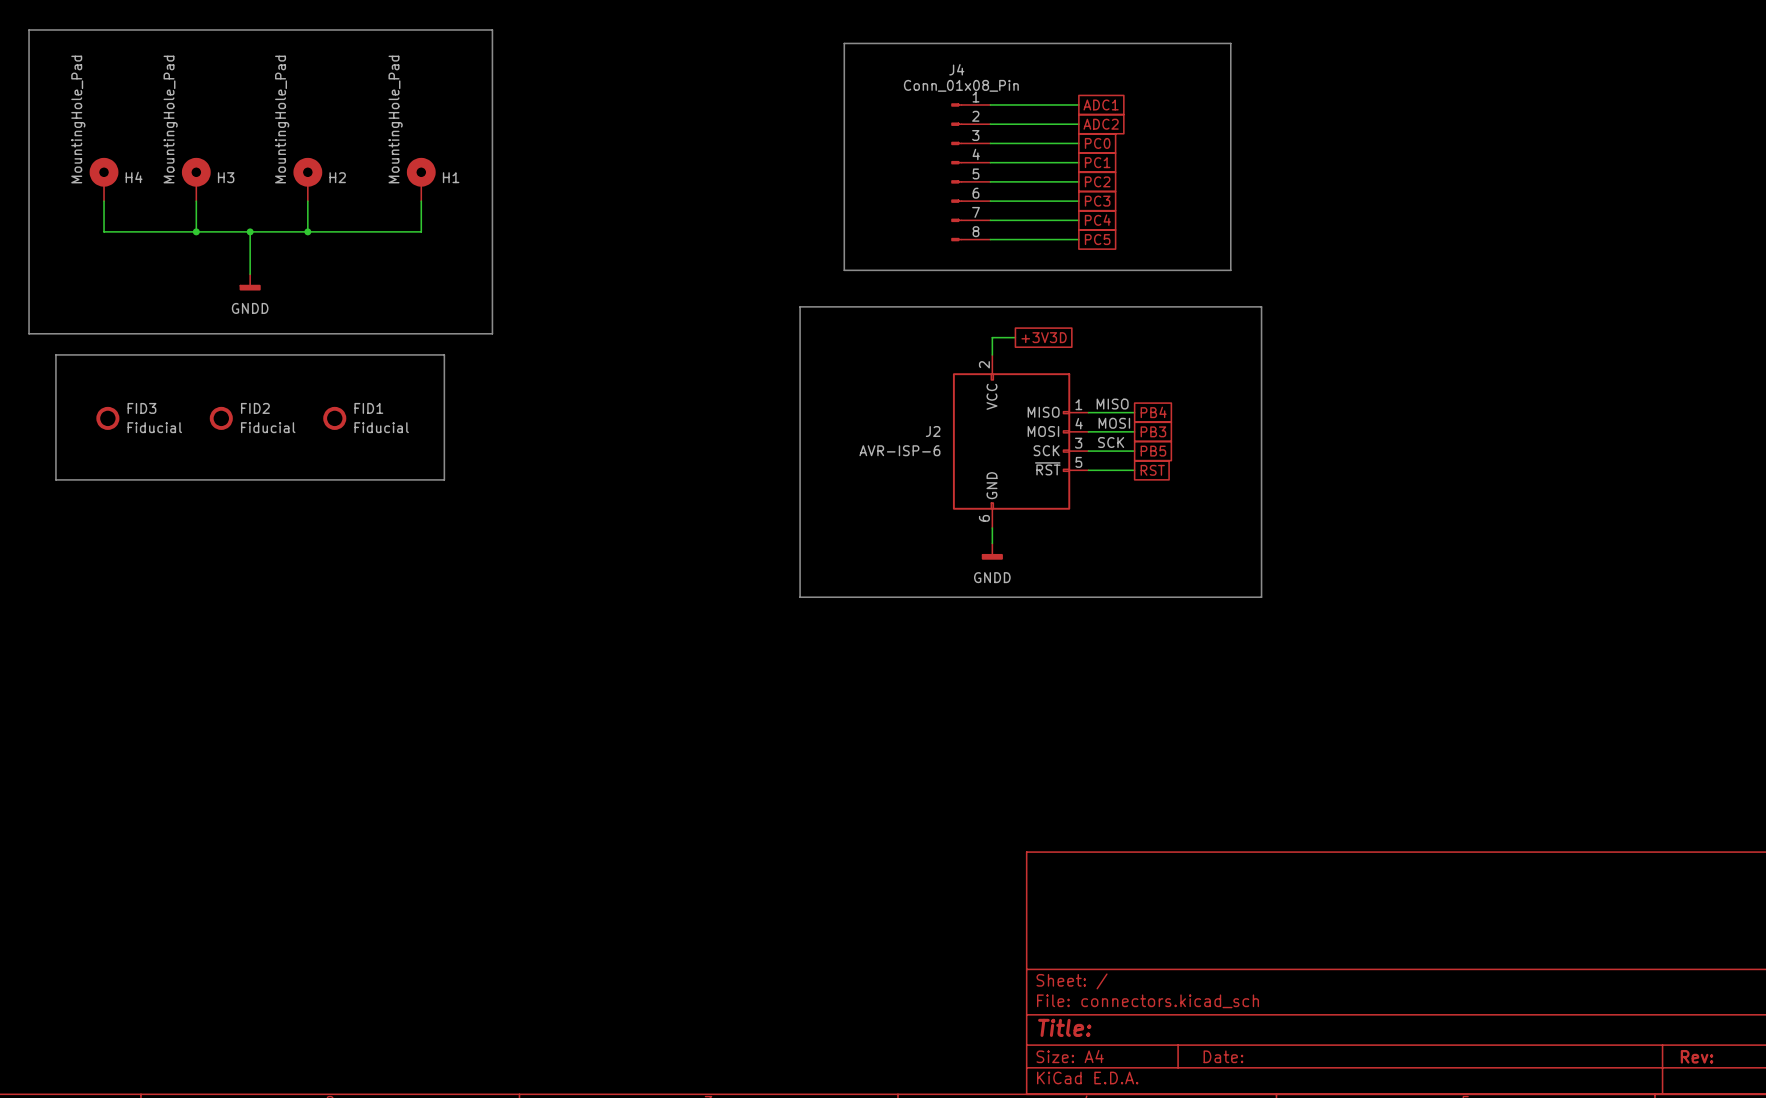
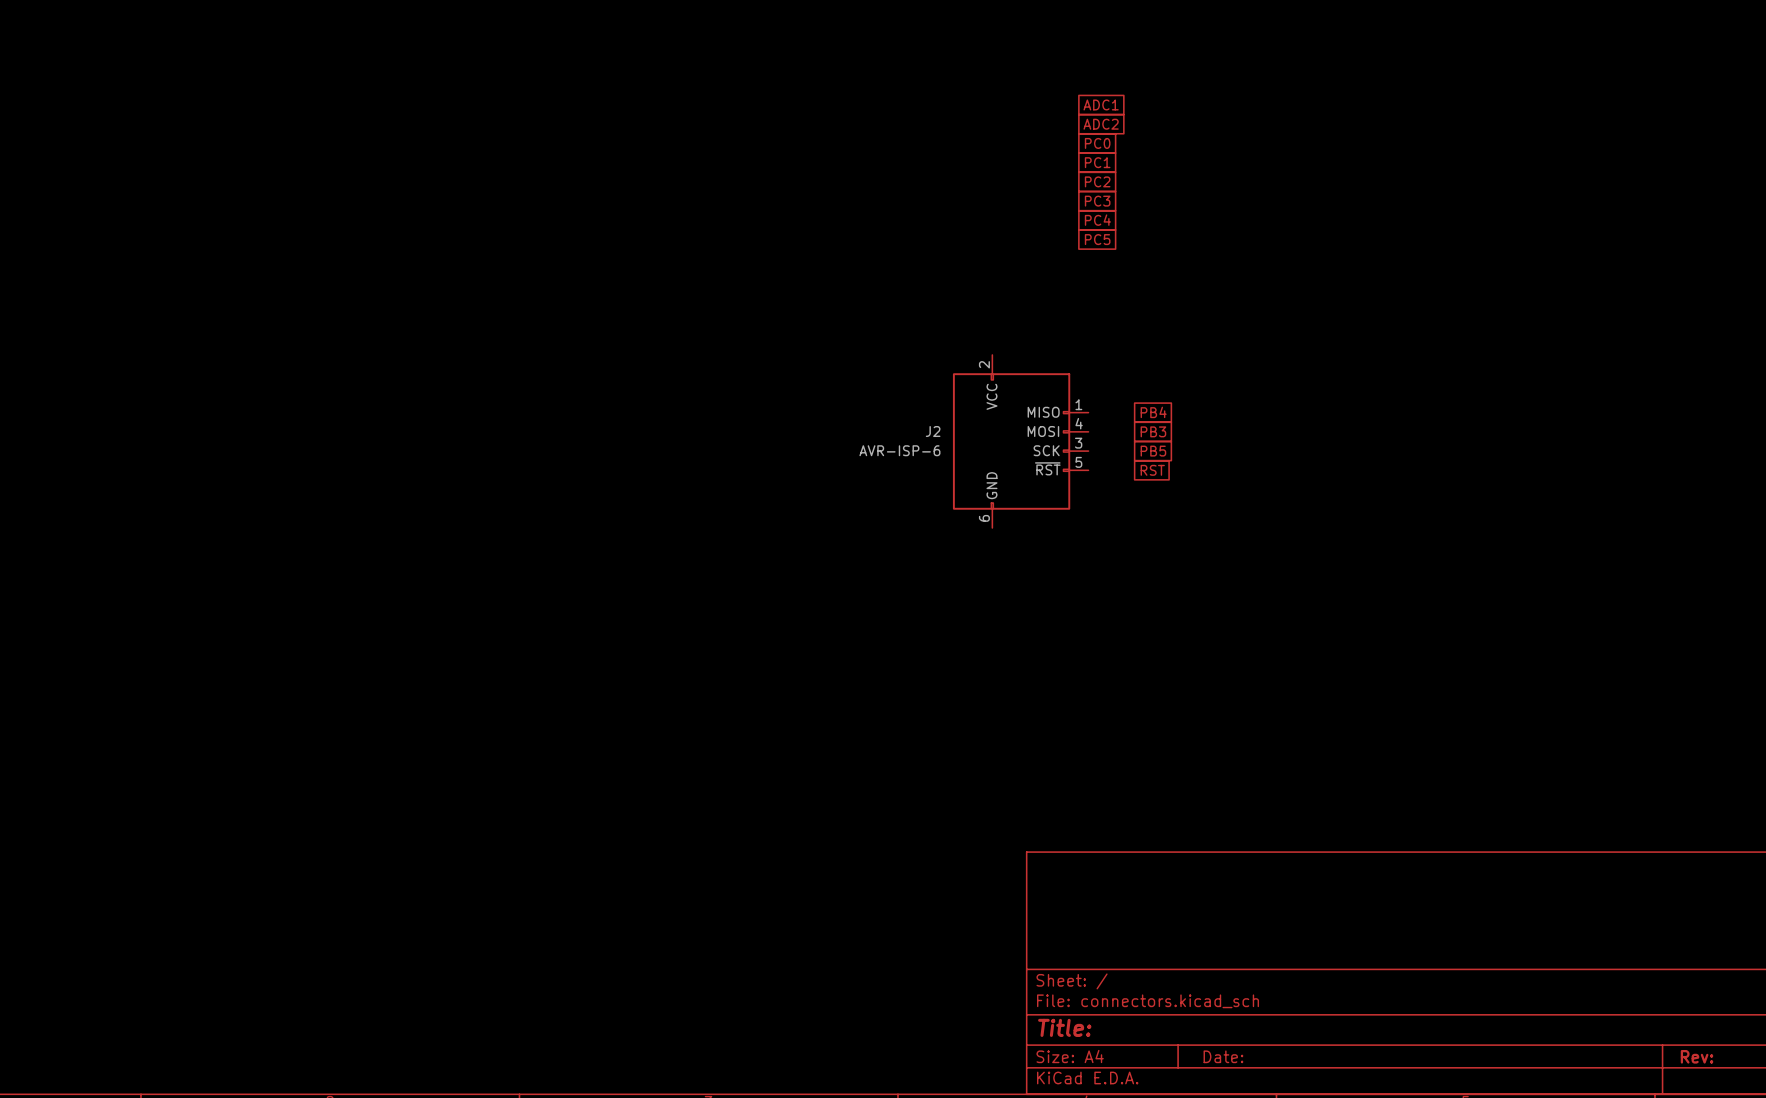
line: (29, 29) (492, 29) (492, 333) (29, 333) (29, 29) -> none
line: (844, 43) (1230, 43) (1230, 270) (844, 270) (844, 43) -> none
wire: (990, 104) (1078, 104) -> none
wire: (990, 124) (1078, 124) -> none
wire: (990, 143) (1078, 143) -> none
wire: (990, 162) (1078, 162) -> none
J4: Conn_01x08_Pin (970, 172) -> none
H4: MountingHole_Pad (104, 179) -> none
H3: MountingHole_Pad (196, 179) -> none
H2: MountingHole_Pad (307, 179) -> none
H1: MountingHole_Pad (421, 179) -> none
wire: (990, 181) (1078, 181) -> none
wire: (104, 201) (104, 231) (421, 231) (421, 201) -> none
wire: (196, 201) (196, 231) -> none
wire: (307, 201) (307, 231) -> none
wire: (990, 201) (1078, 201) -> none
wire: (990, 220) (1078, 220) -> none
junction: (196, 231) -> none
wire: (250, 231) (250, 274) -> none
junction: (250, 231) -> none
junction: (307, 231) -> none
wire: (990, 239) (1078, 239) -> none
power symbol: GNDD (250, 282) -> none
line: (800, 306) (1261, 306) (1261, 597) (800, 597) (800, 306) -> none
wire: (1015, 337) (992, 337) (992, 354) -> none
global label: +3V3D (1044, 337) -> none
line: (55, 354) (444, 354) (444, 479) (55, 479) (55, 354) -> none
label: MISO (1112, 404) -> none
wire: (1088, 412) (1134, 412) -> none
FID3: Fiducial (107, 418) -> none
FID2: Fiducial (221, 418) -> none
FID1: Fiducial (334, 418) -> none
label: MOSI (1114, 423) -> none
wire: (1088, 431) (1134, 431) -> none
label: SCK (1111, 442) -> none
wire: (1088, 451) (1134, 451) -> none
wire: (1088, 470) (1134, 470) -> none
wire: (992, 528) (992, 543) -> none
power symbol: GNDD (992, 551) -> none

